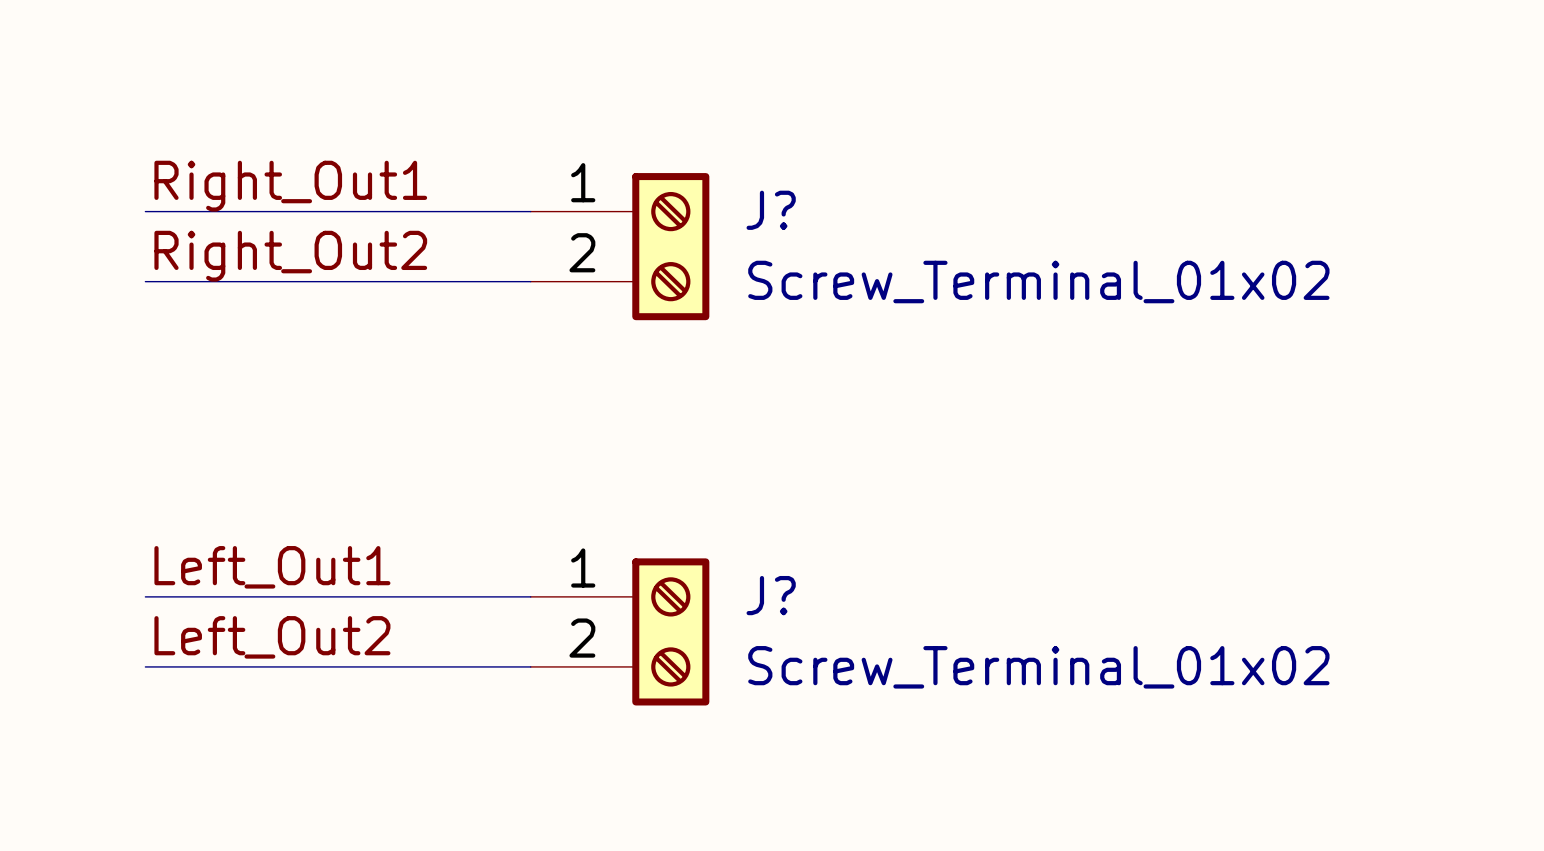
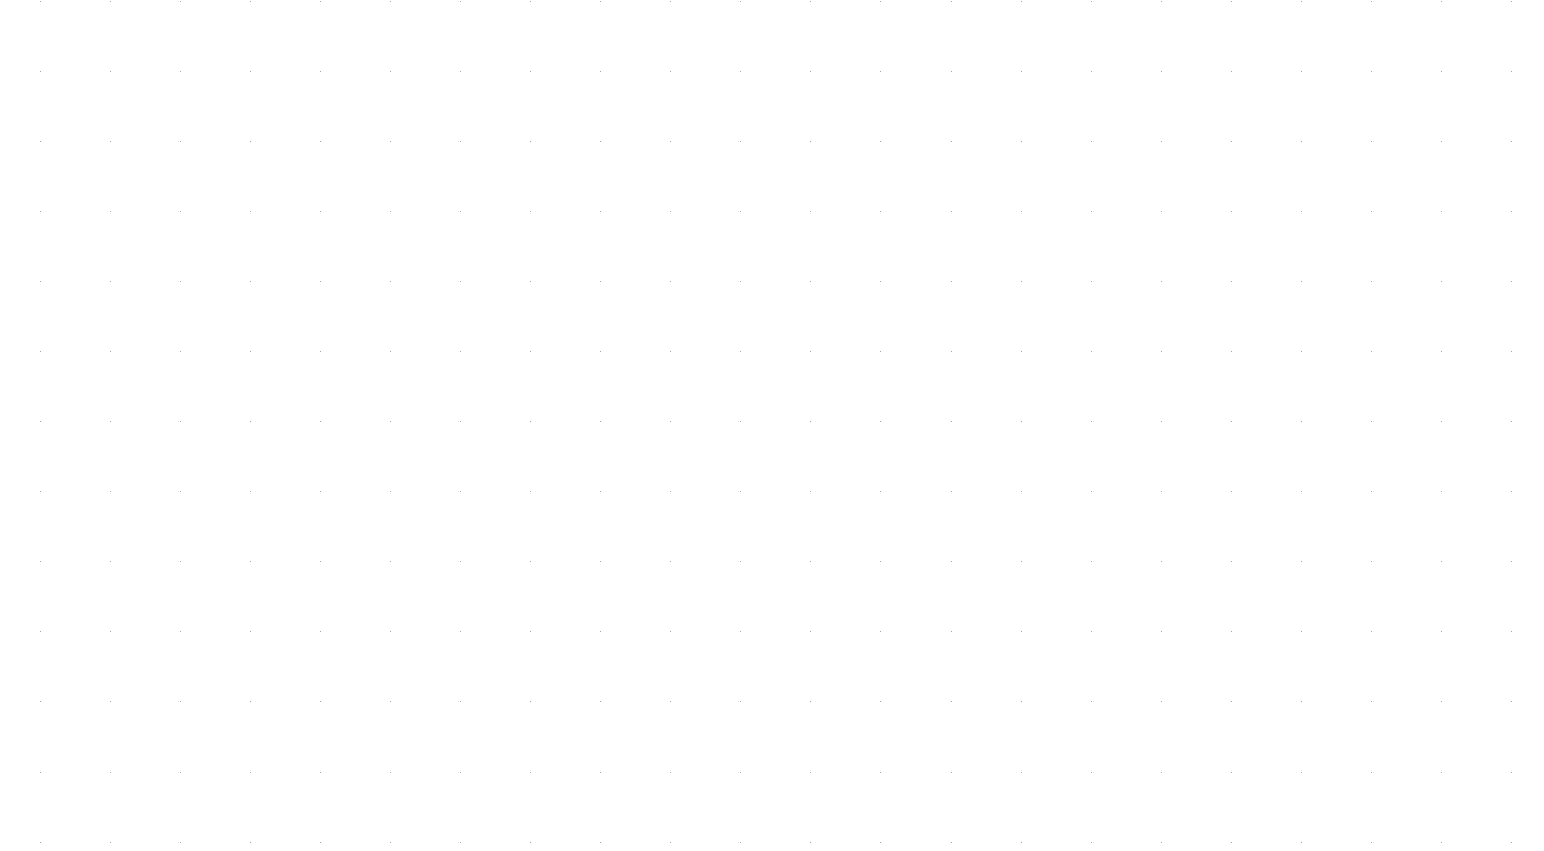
label: Right_Out1 (290, 186) -> none
wire: (145, 211) (530, 211) -> none
J?: Screw_Terminal_01x02 (620, 246) -> none
label: Right_Out2 (290, 256) -> none
wire: (145, 281) (530, 281) -> none
label: Left_Out1 (272, 567) -> none
wire: (145, 596) (530, 596) -> none
J?: Screw_Terminal_01x02 (620, 631) -> none
label: Left_Out2 (272, 637) -> none
wire: (145, 666) (530, 666) -> none

